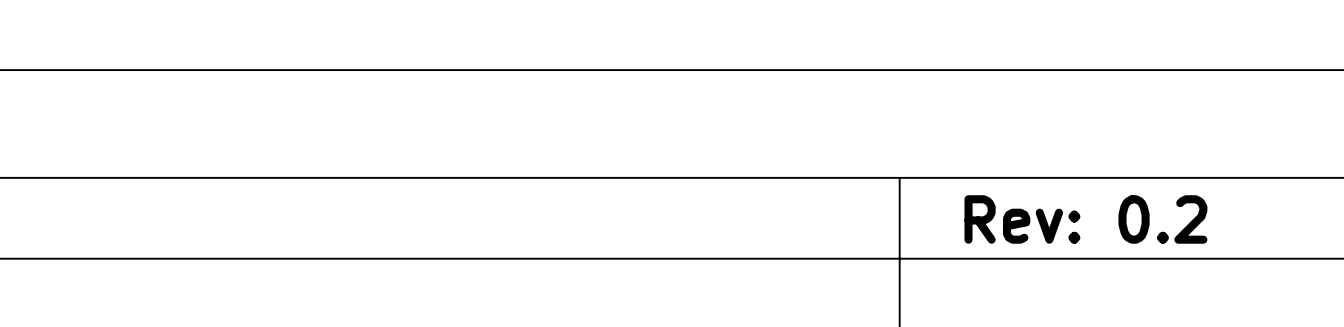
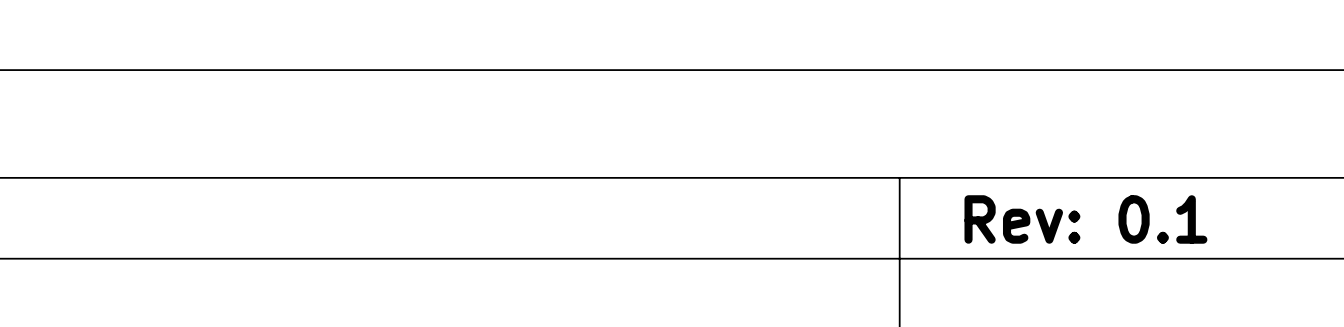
title block: Rev: 0.2 (1085, 219) -> Rev: 0.1 (1085, 219)

